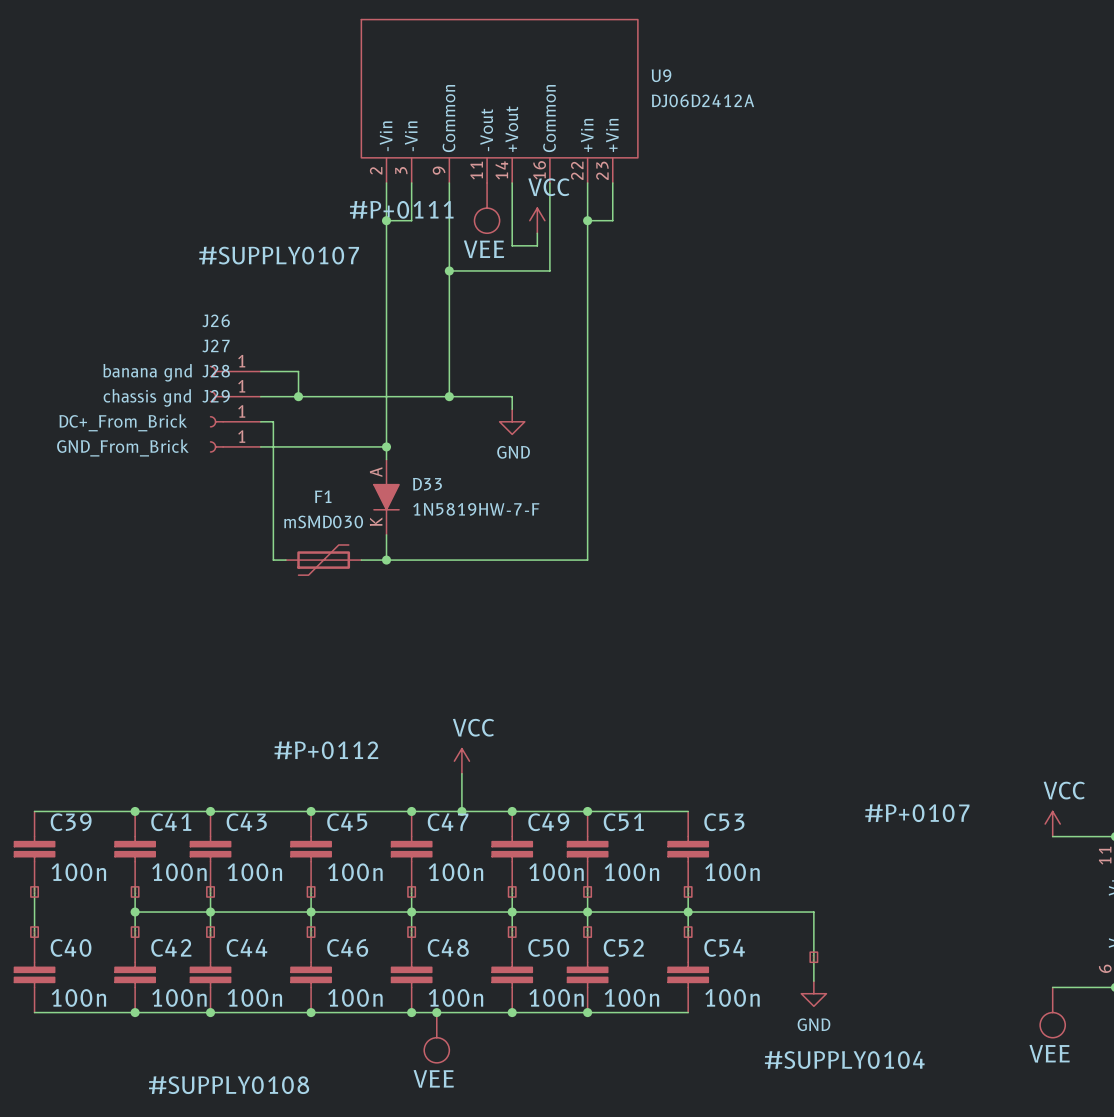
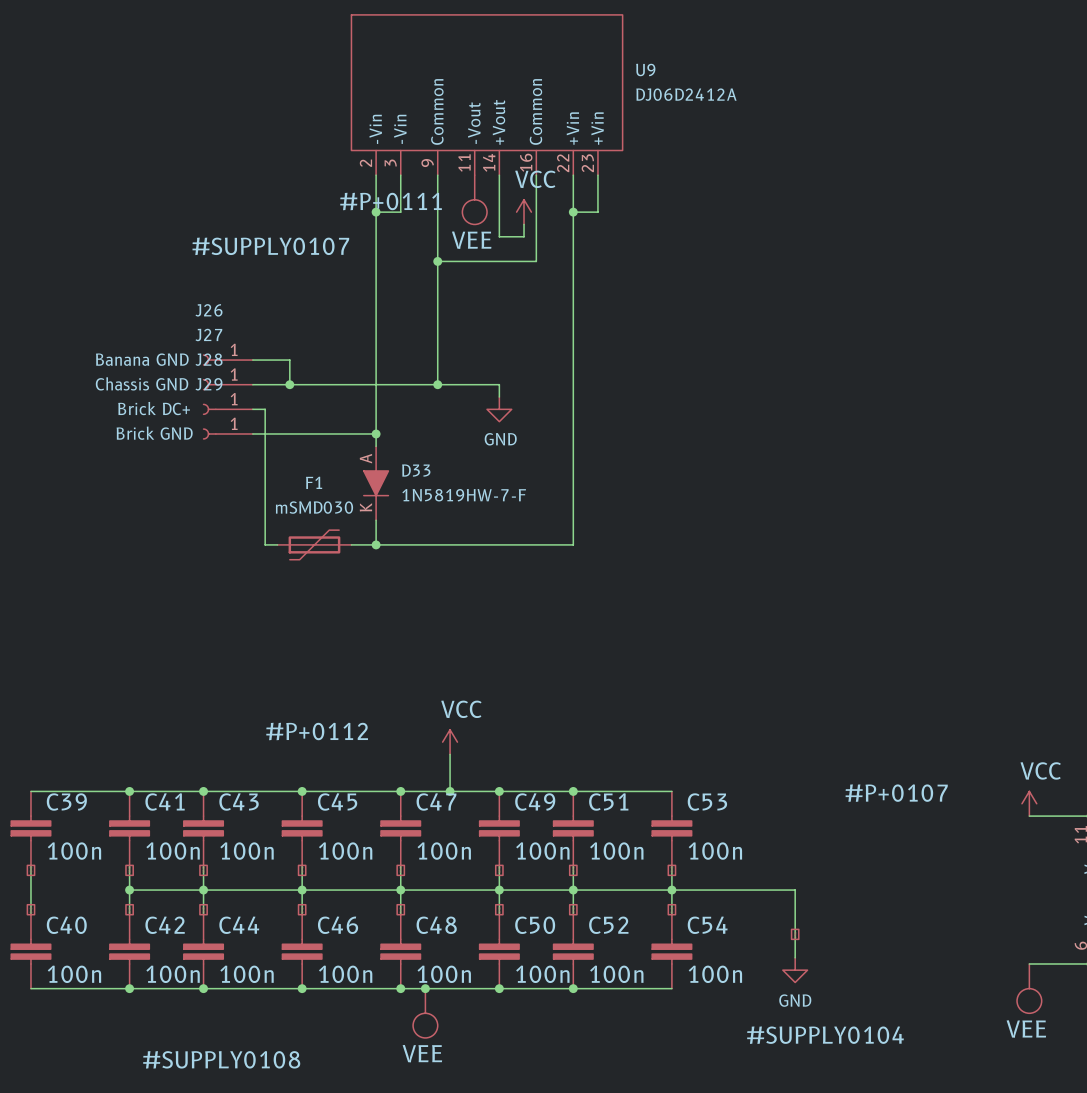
J26 value: banana gnd (147, 372) -> Banana GND (142, 359)
J27 value: chassis gnd (147, 397) -> Chassis GND (142, 383)
J28 value: DC+_From_Brick (123, 422) -> Brick DC+ (154, 408)
J29 value: GND_From_Brick (122, 447) -> Brick GND (154, 433)

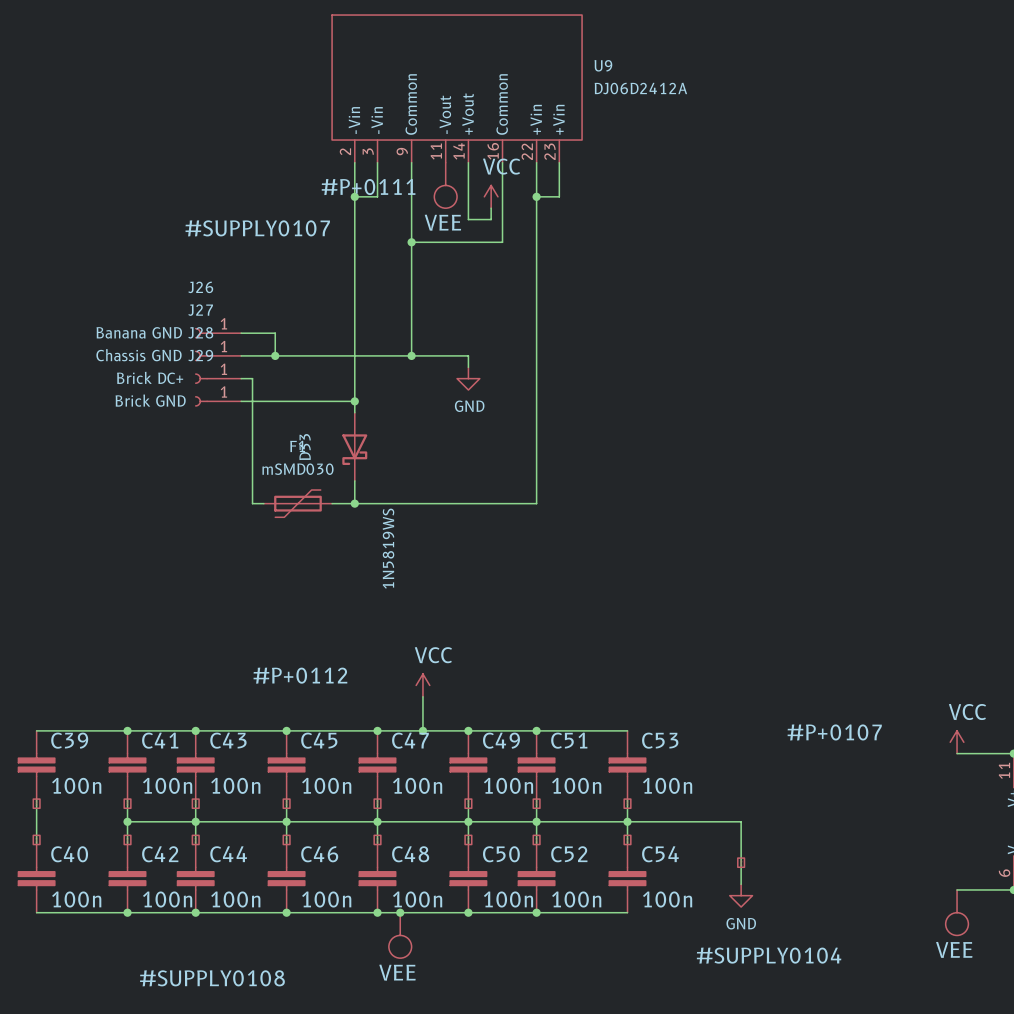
D33 symbol: [363, 446, 389, 521] -> [342, 412, 368, 481]
D33 name position: D33 (416, 470) -> D33 (305, 447)
D33 value: 1N5819HW-7-F (464, 495) -> 1N5819WS (388, 548)

